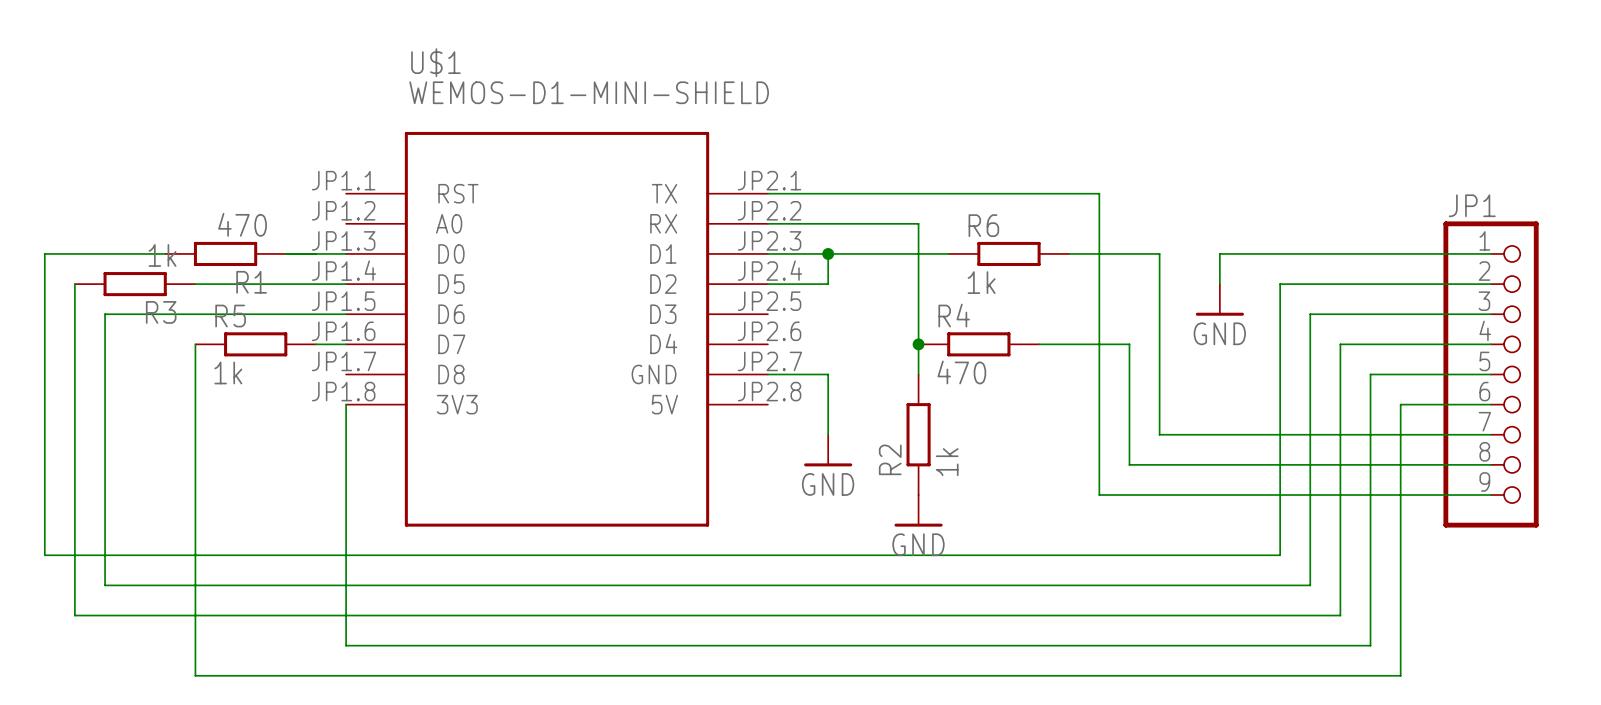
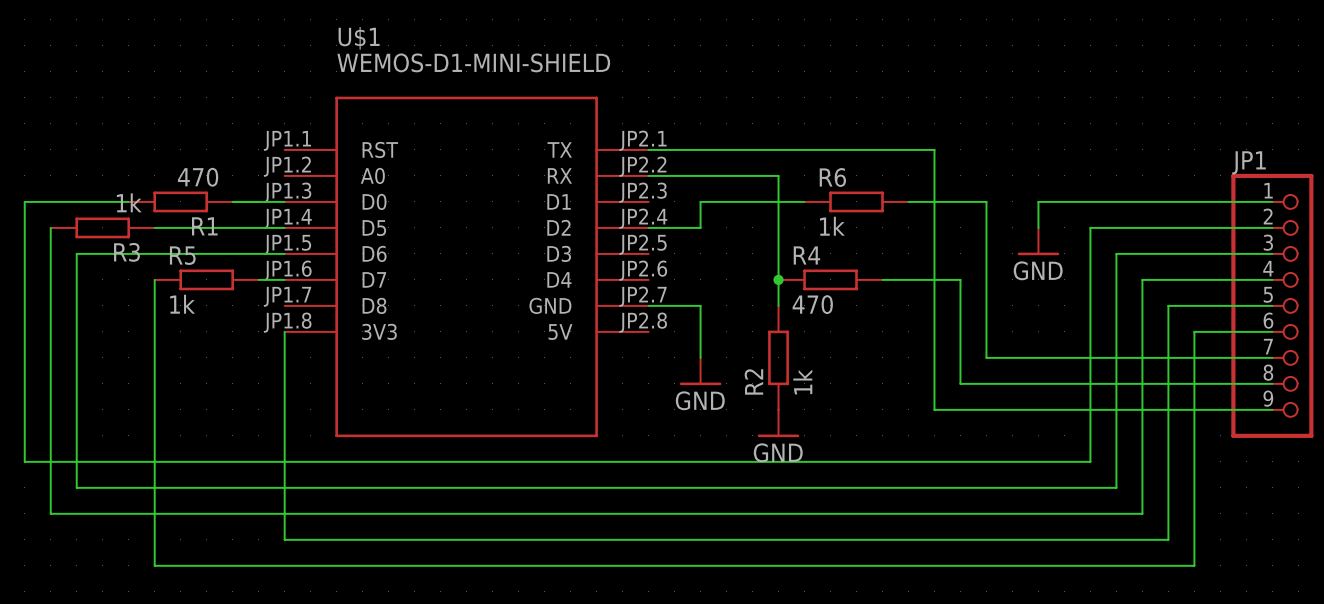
wire: (767, 253) (828, 253) -> none
junction: (828, 253) -> none

